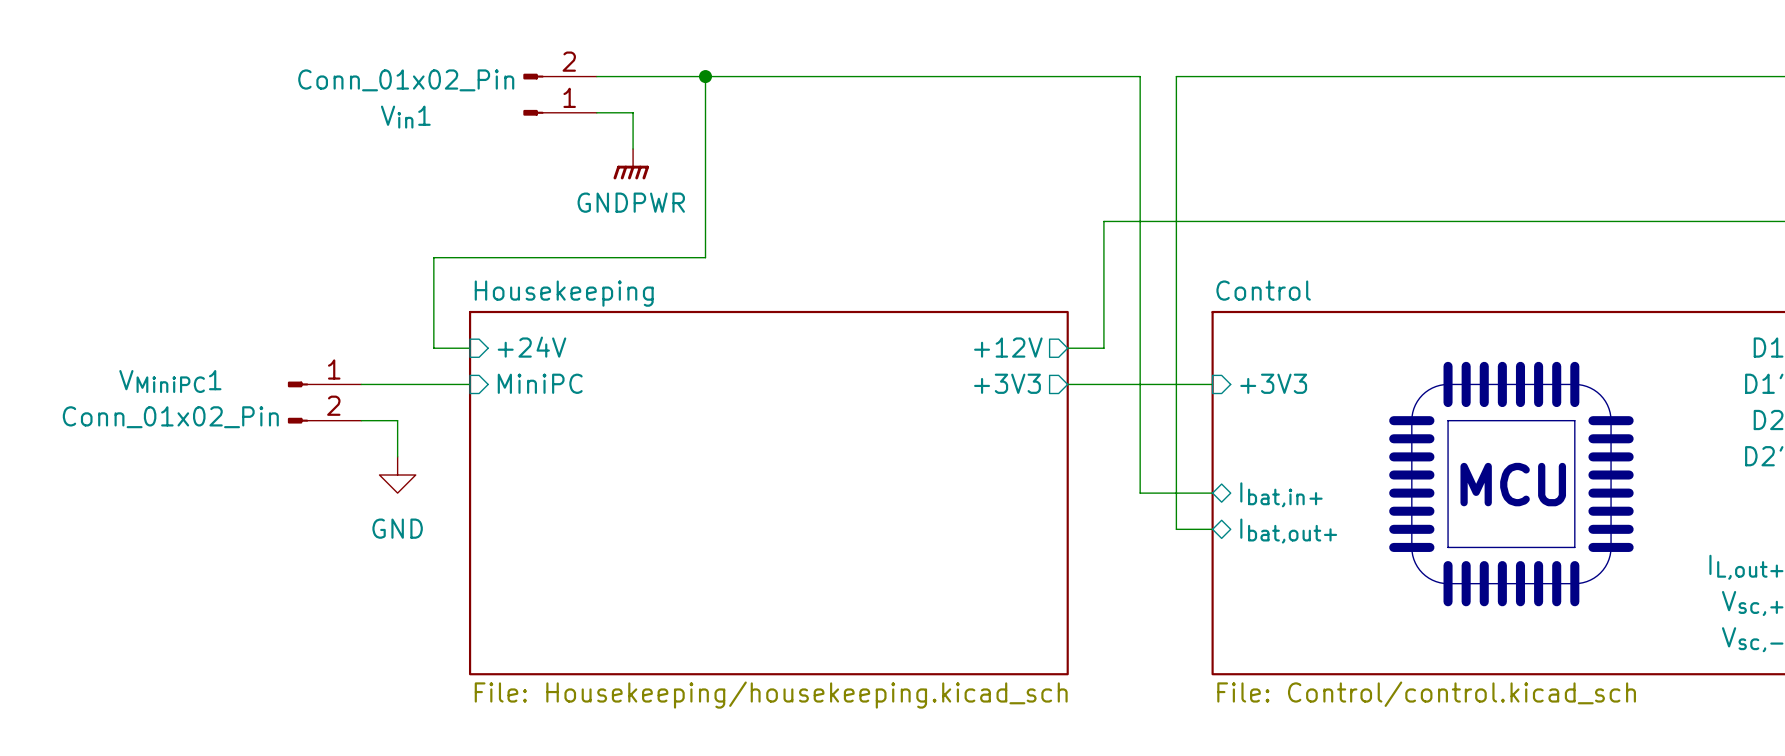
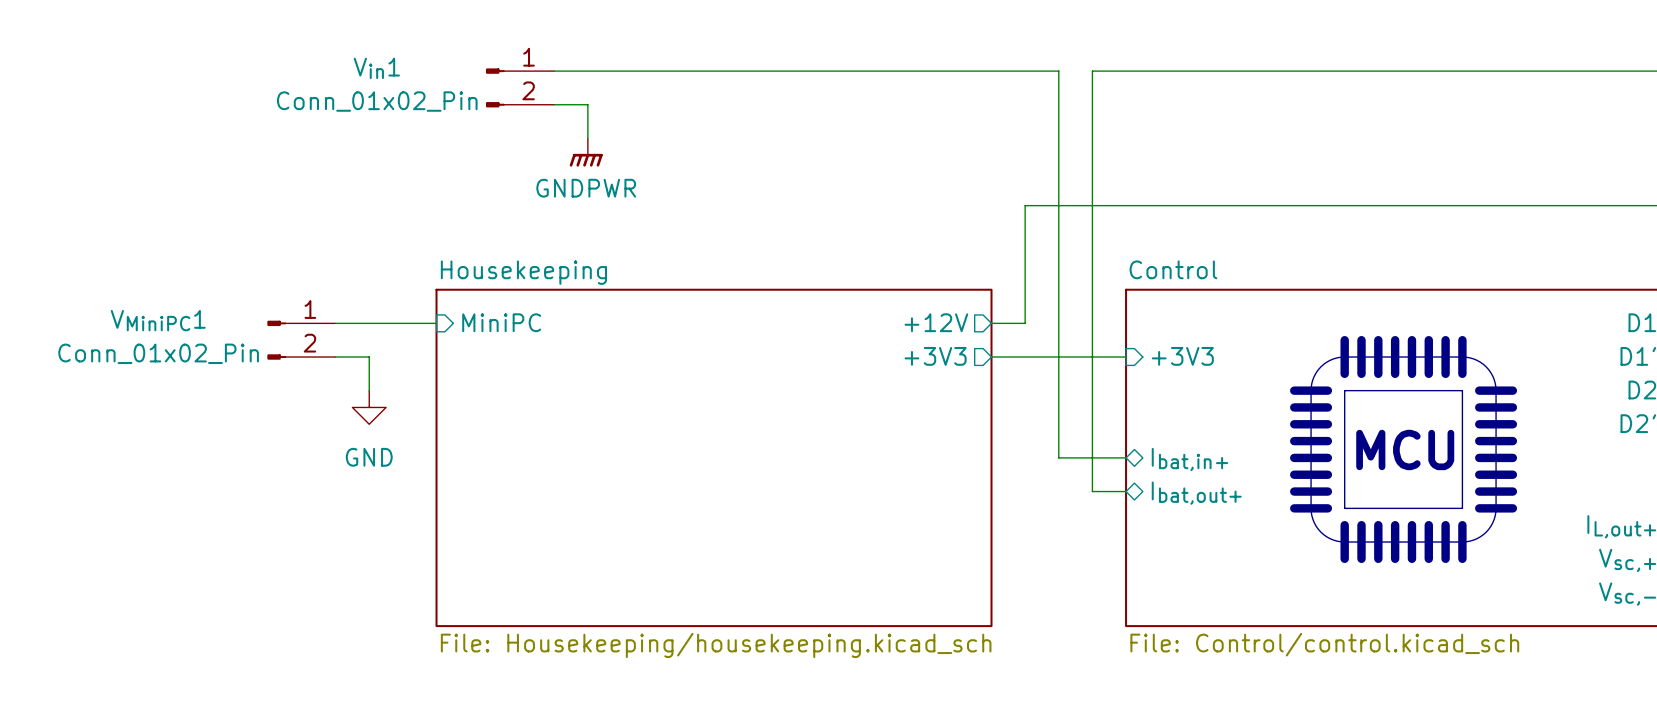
wire: (705, 76) (705, 257) (433, 257) (433, 348) -> (335, 323) (402, 323)
junction: (705, 76) -> none
Vin1 flip: as is (533, 94) -> up-down (495, 87)
sheet pin: +24V (532, 347) -> MiniPC (501, 322)
sheet pin: MiniPC (540, 383) -> none
wire: (397, 384) (470, 384) -> (369, 357) (369, 390)
VMiniPC1 position: (324, 402) -> (301, 340)
wire: (361, 420) (397, 420) (397, 456) -> none
power symbol position: GND (397, 475) -> GND (369, 407)

